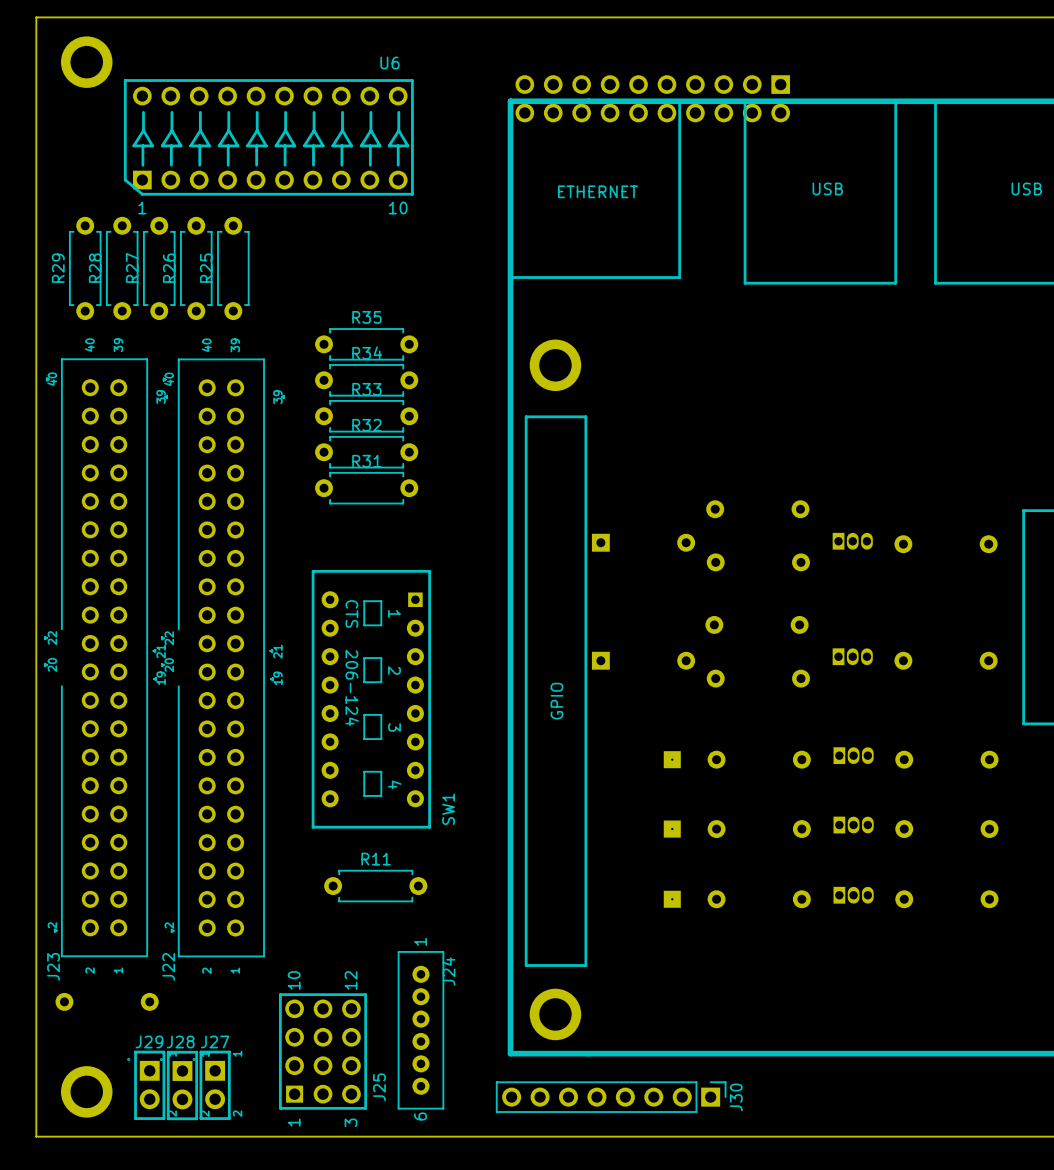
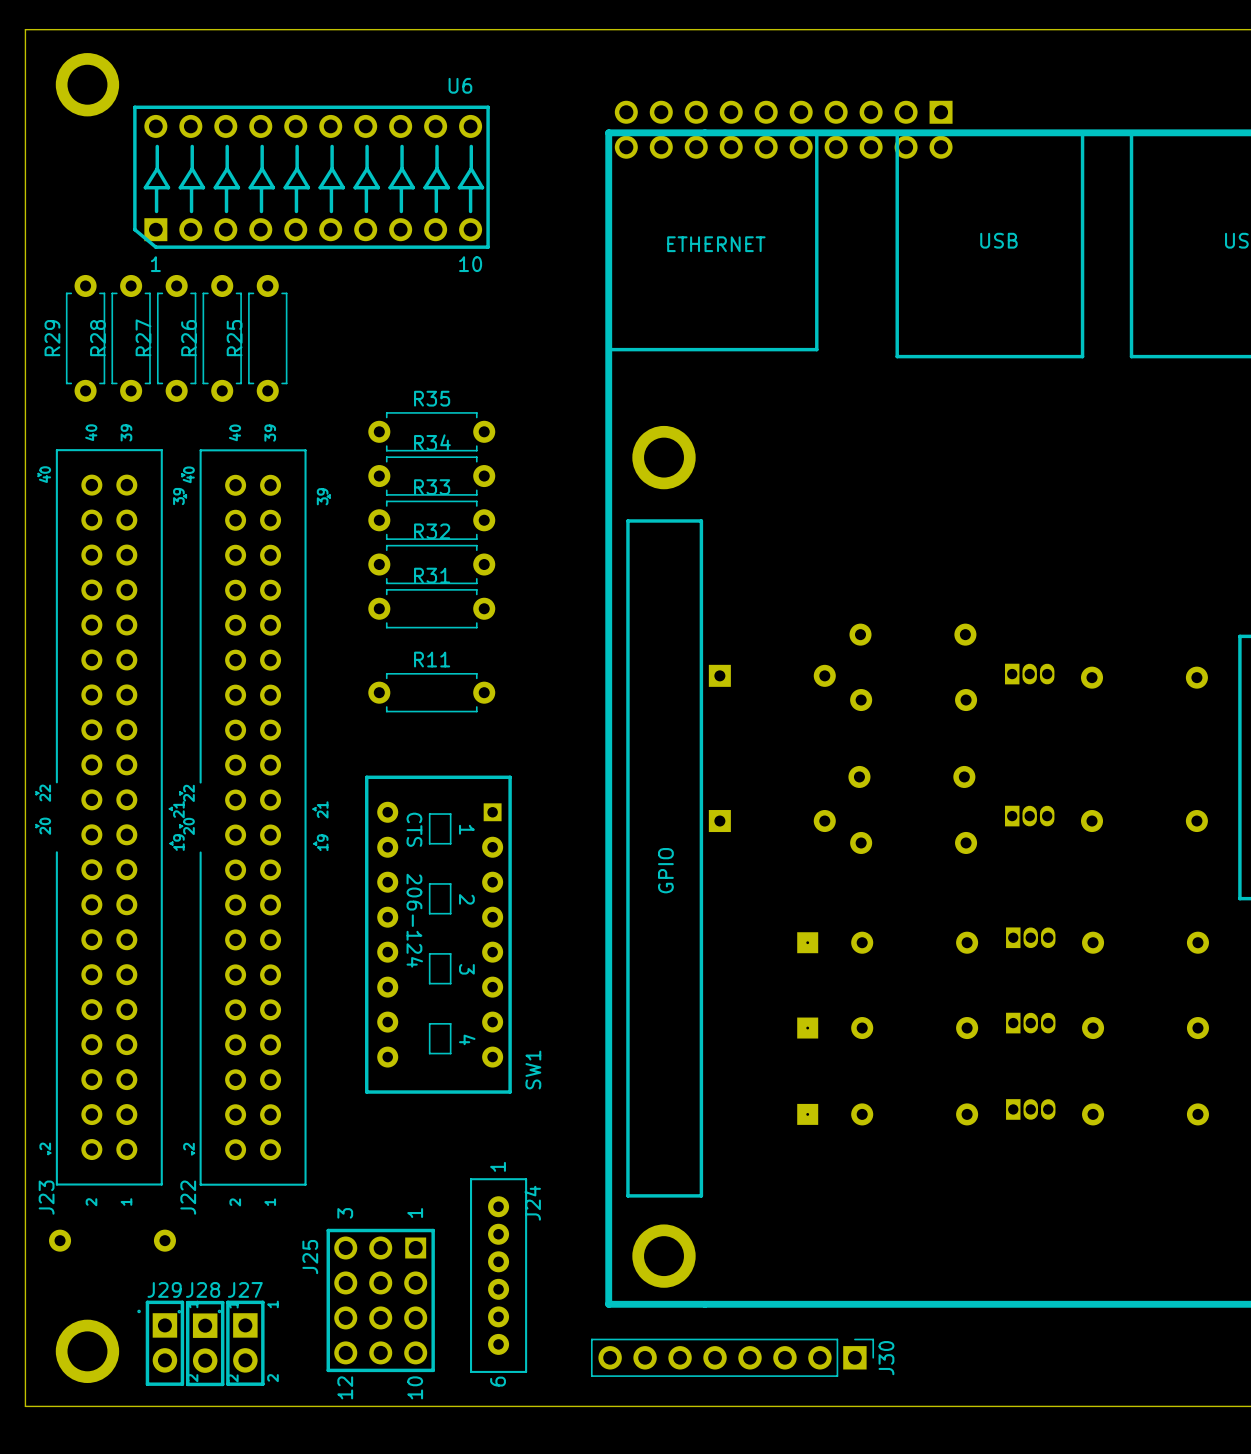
SW1 position: (371, 699) -> (438, 934)
R11 position: (375, 886) -> (431, 692)
J25 rotation: 0° (323, 1051) -> 180° (380, 1300)

